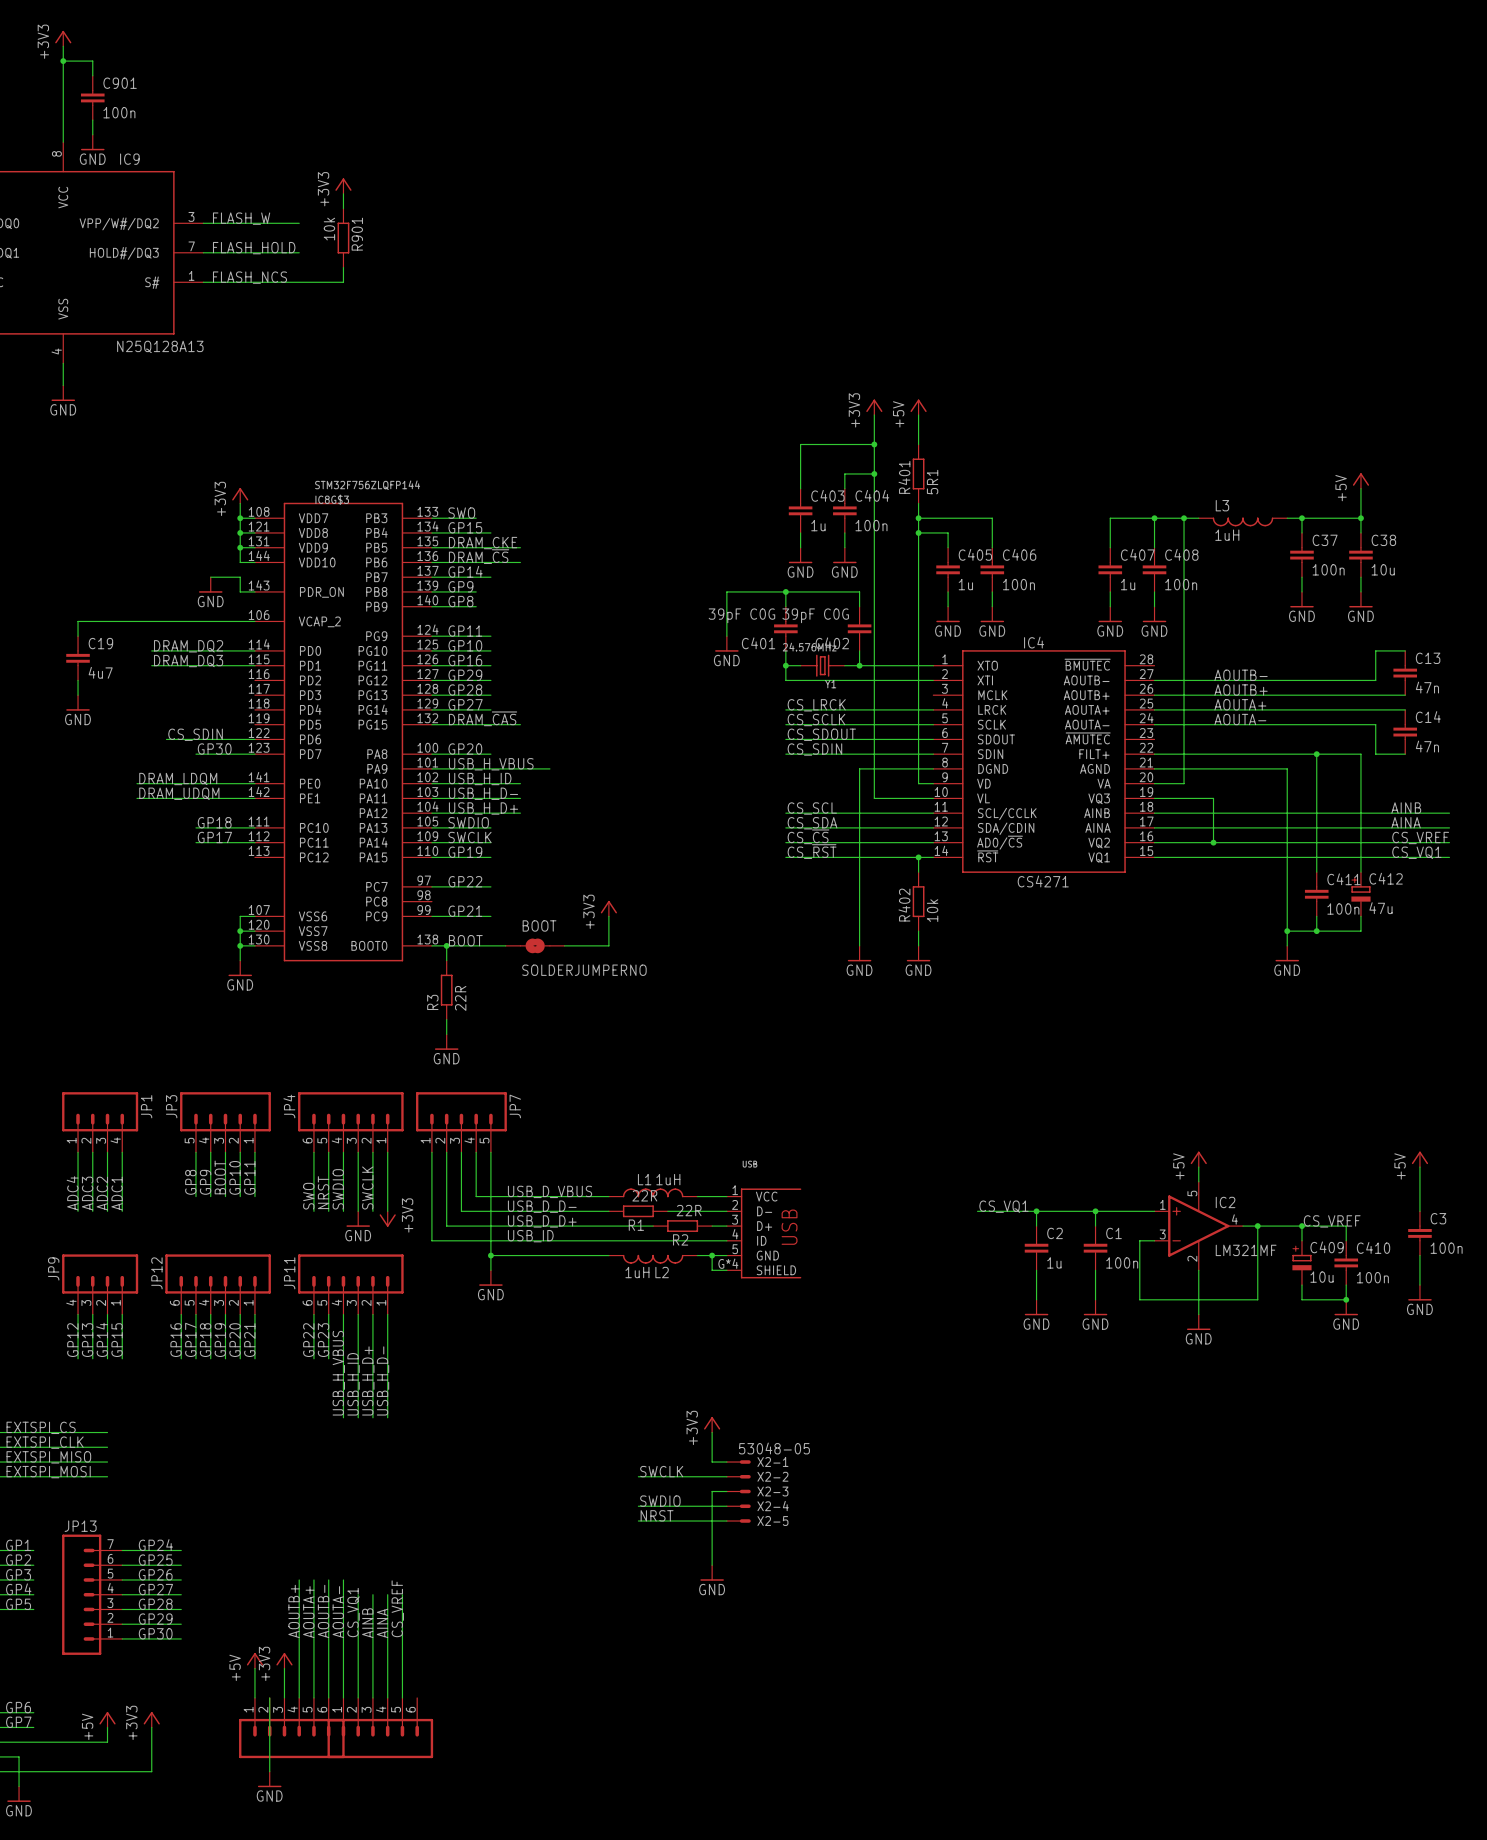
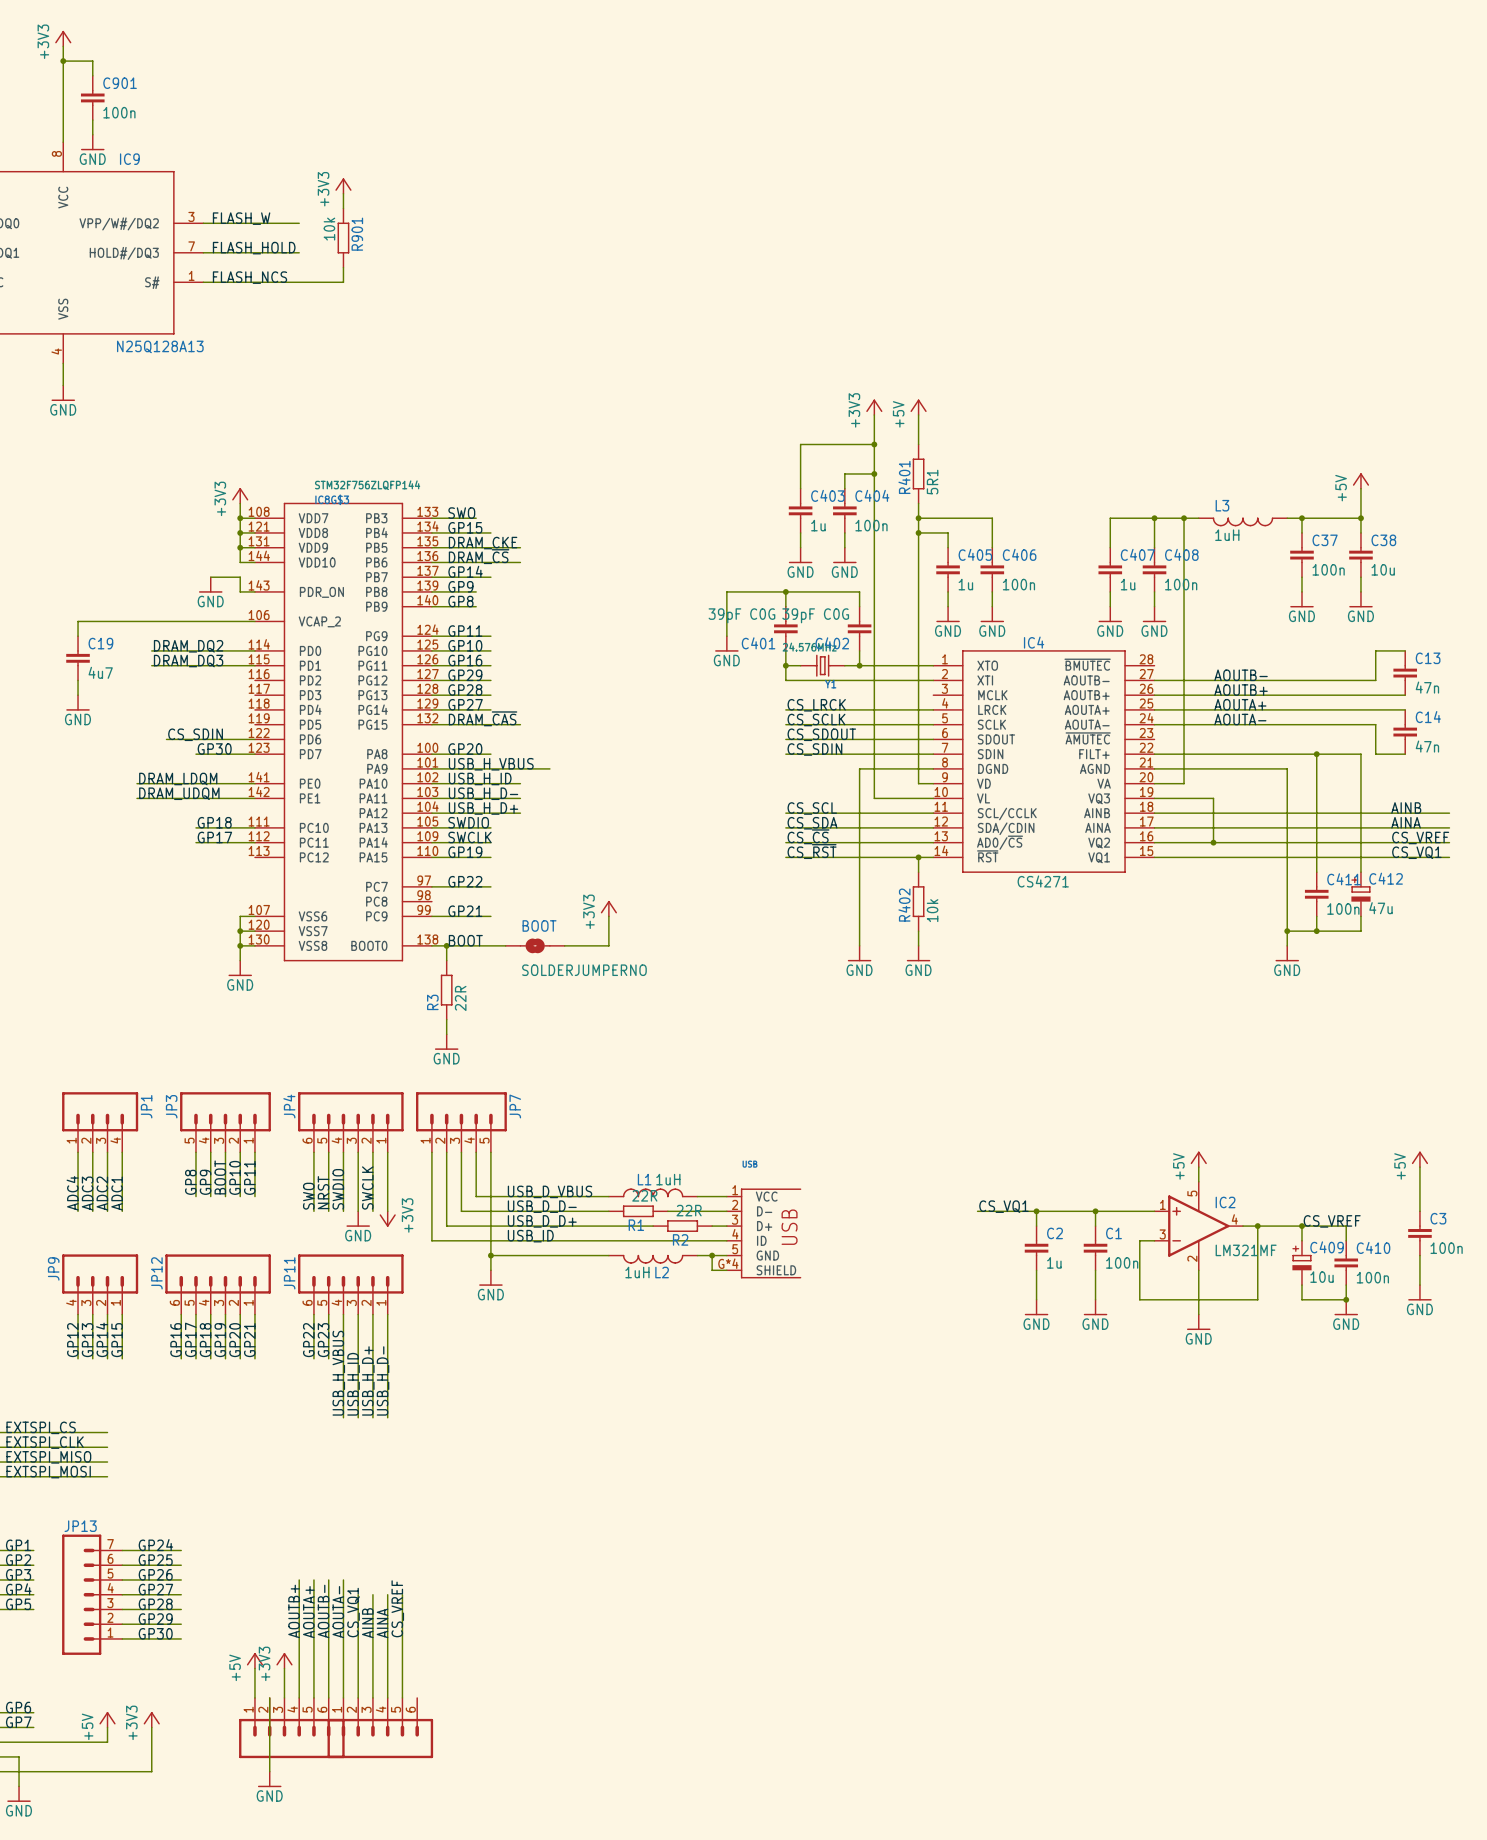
power symbol: +3V3 (712, 1424) -> none
wire: (712, 1432) (712, 1462) (726, 1462) -> none
X2-1: 53048-05 (738, 1462) -> none
label: SWCLK (661, 1471) -> none
wire: (638, 1476) (726, 1476) -> none
X2-2: (738, 1476) -> none
wire: (726, 1491) (712, 1491) (712, 1565) -> none
X2-3: (738, 1491) -> none
label: SWDIO (660, 1501) -> none
wire: (638, 1506) (726, 1506) -> none
X2-4: (738, 1506) -> none
label: NRST (657, 1515) -> none
wire: (638, 1521) (726, 1521) -> none
X2-5: (738, 1521) -> none
power symbol: GND (712, 1572) -> none

